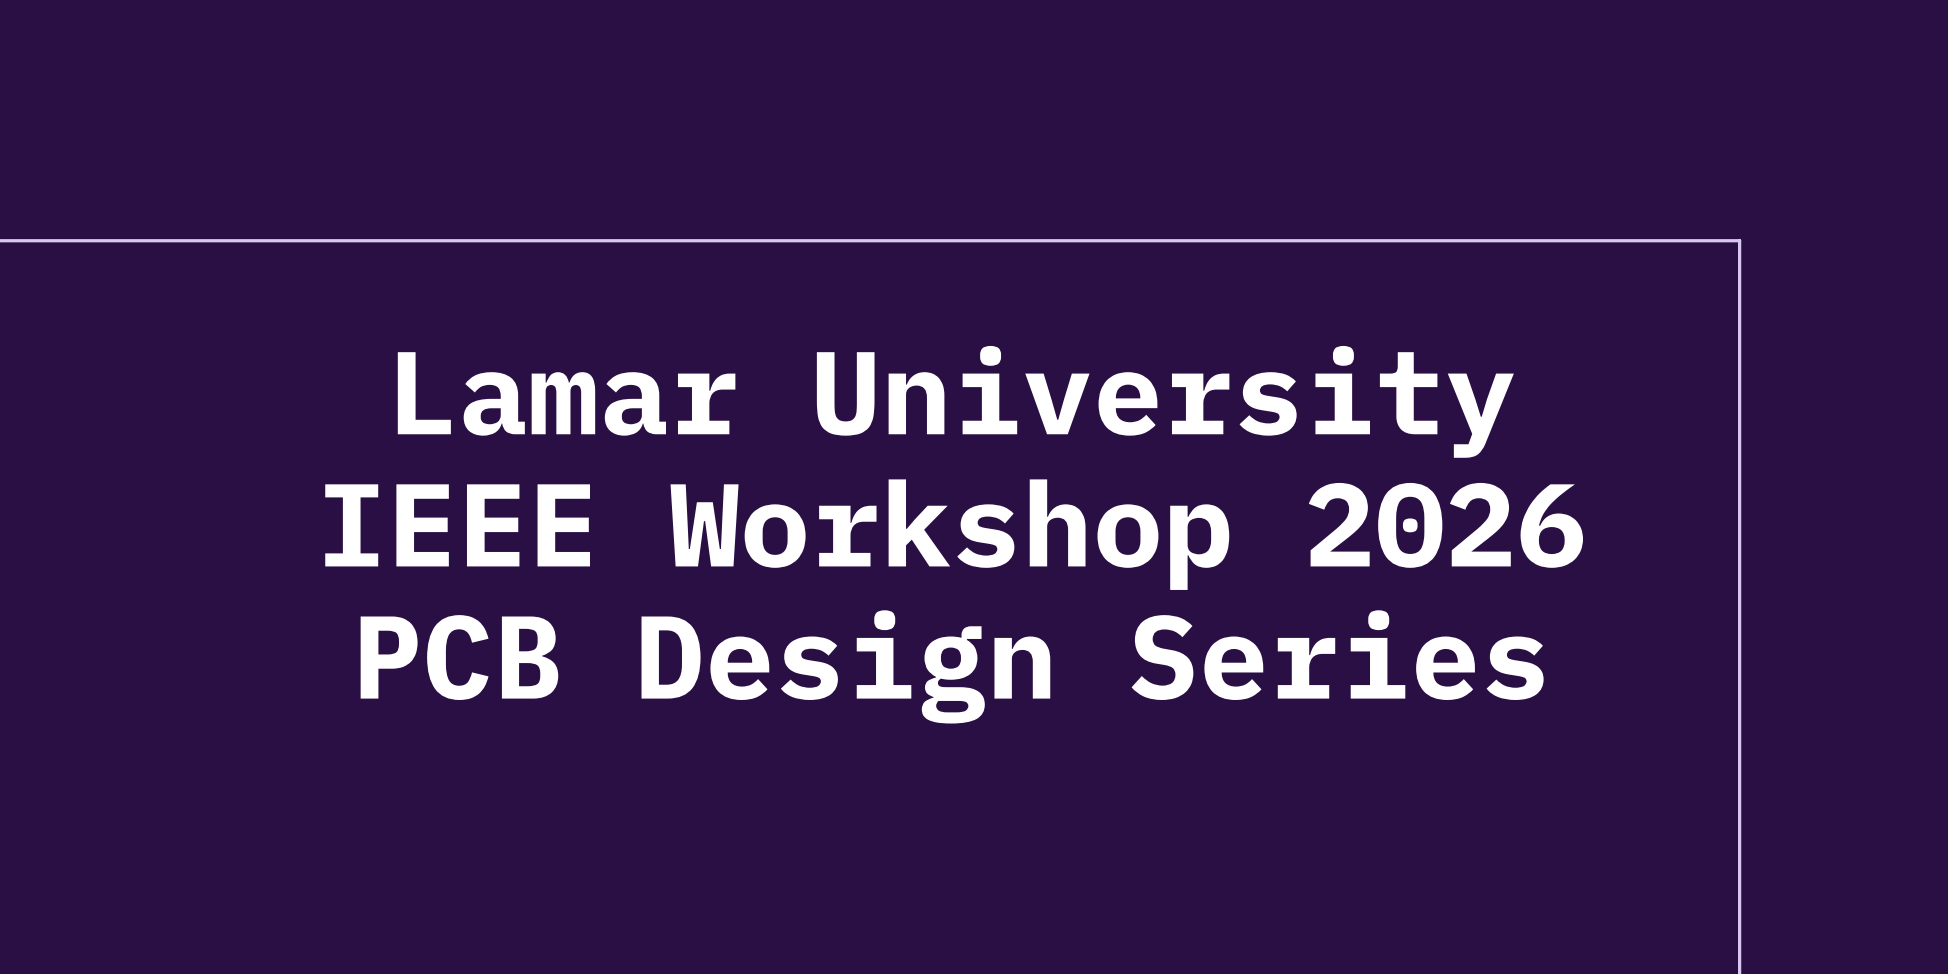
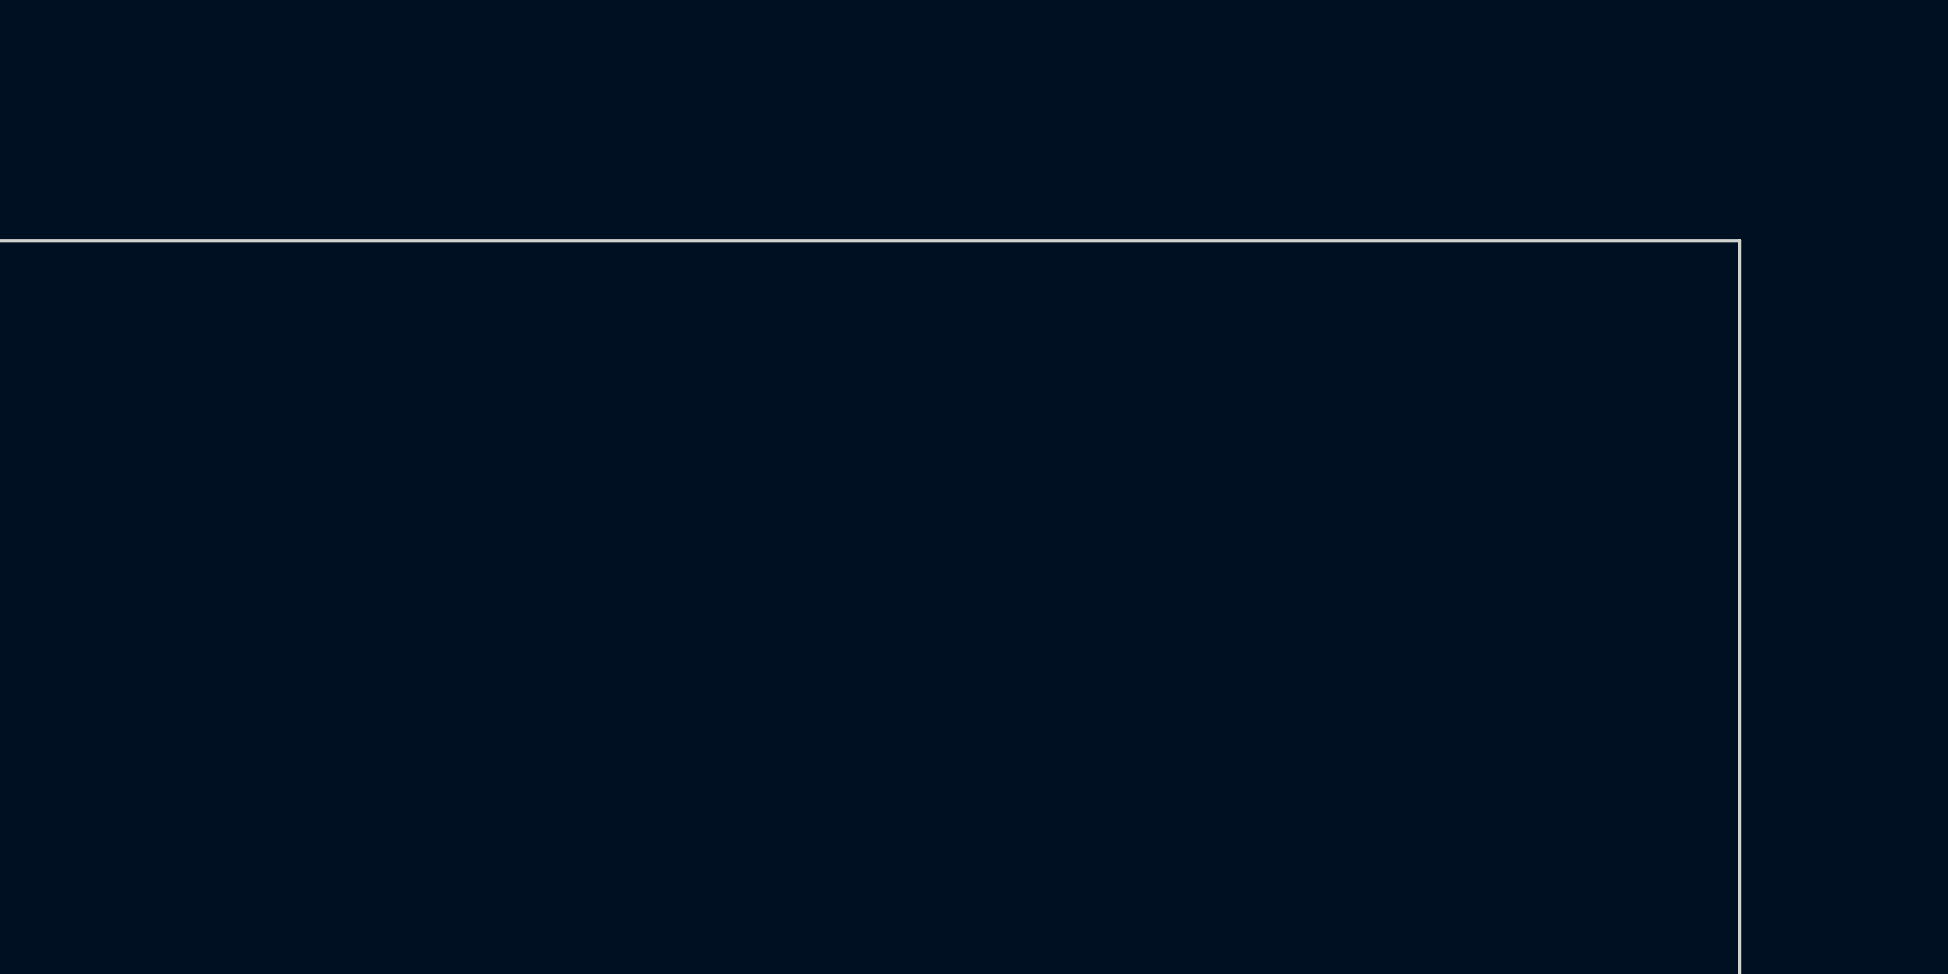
text: Lamar University (955, 401) -> none
text: IEEE Workshop 2026 (954, 534) -> none
text: PCB Design Series (952, 666) -> none

